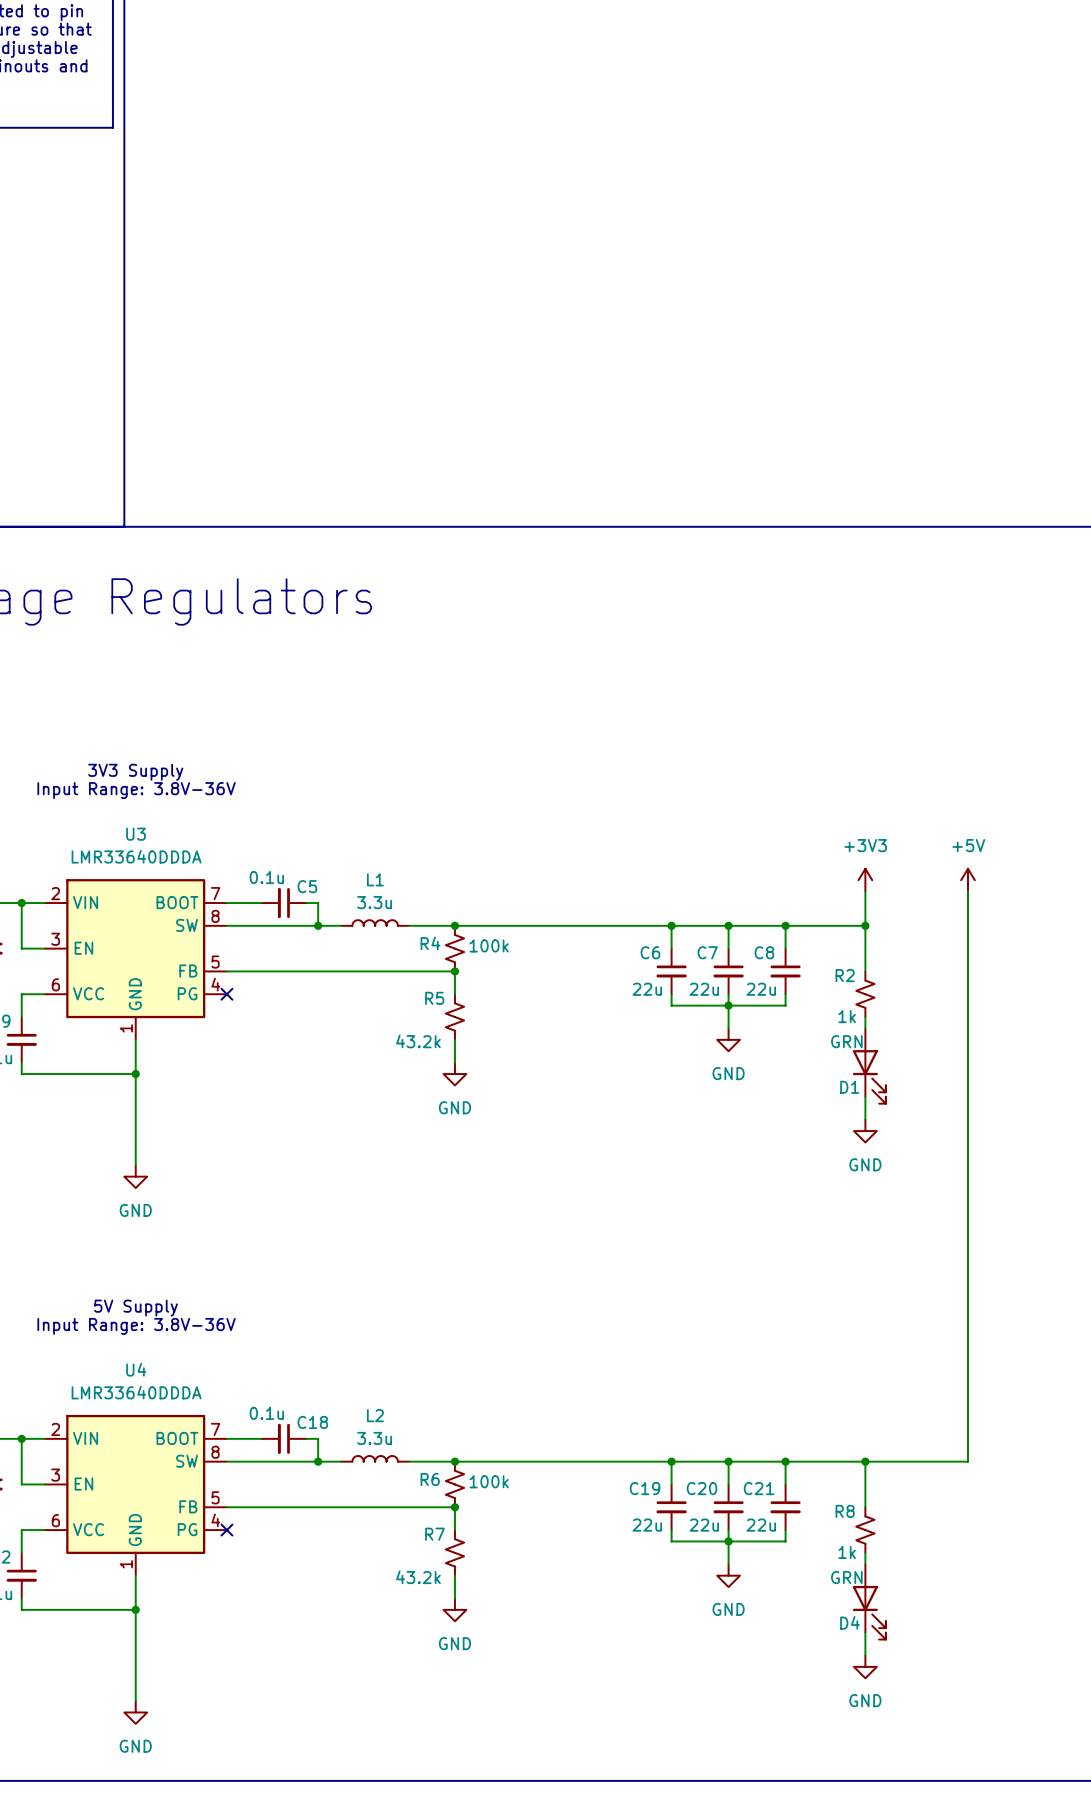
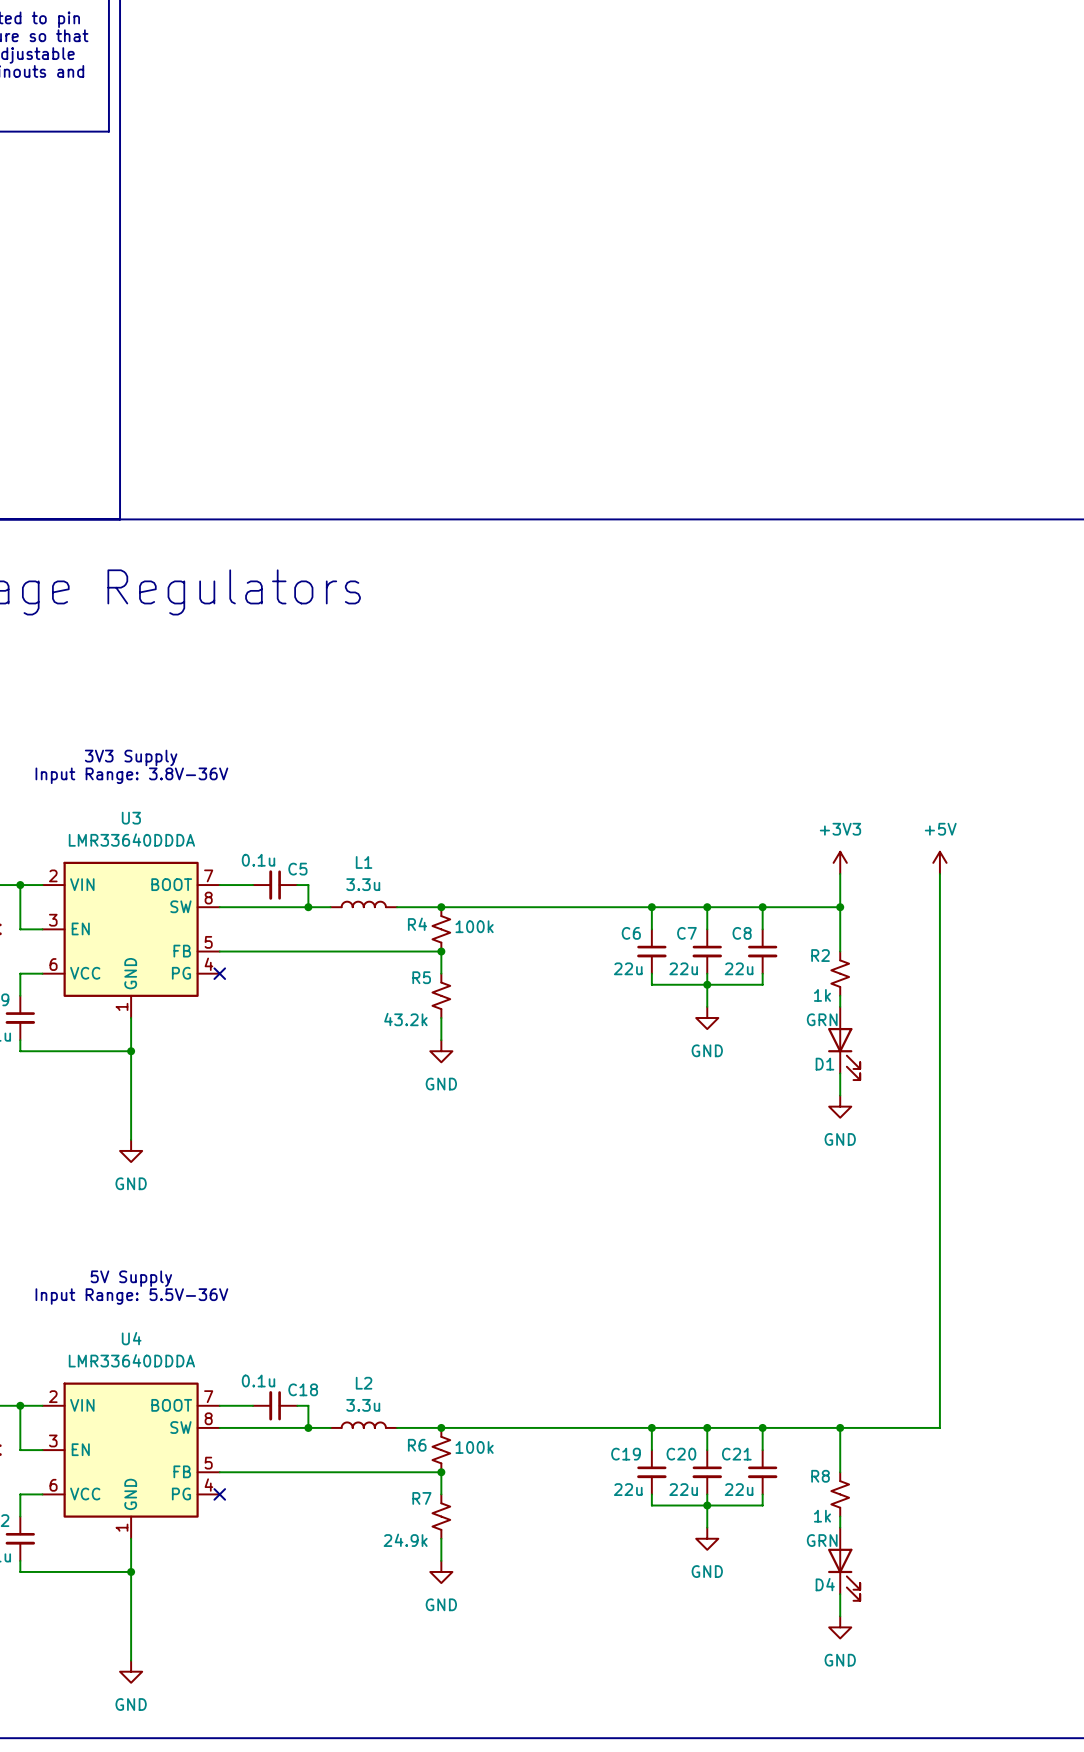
text: Input Range: 3.8V-36V (136, 1326) -> Input Range: 5.5V-36V (131, 1296)
R7 value: 43.2k (418, 1577) -> 24.9k (405, 1540)

